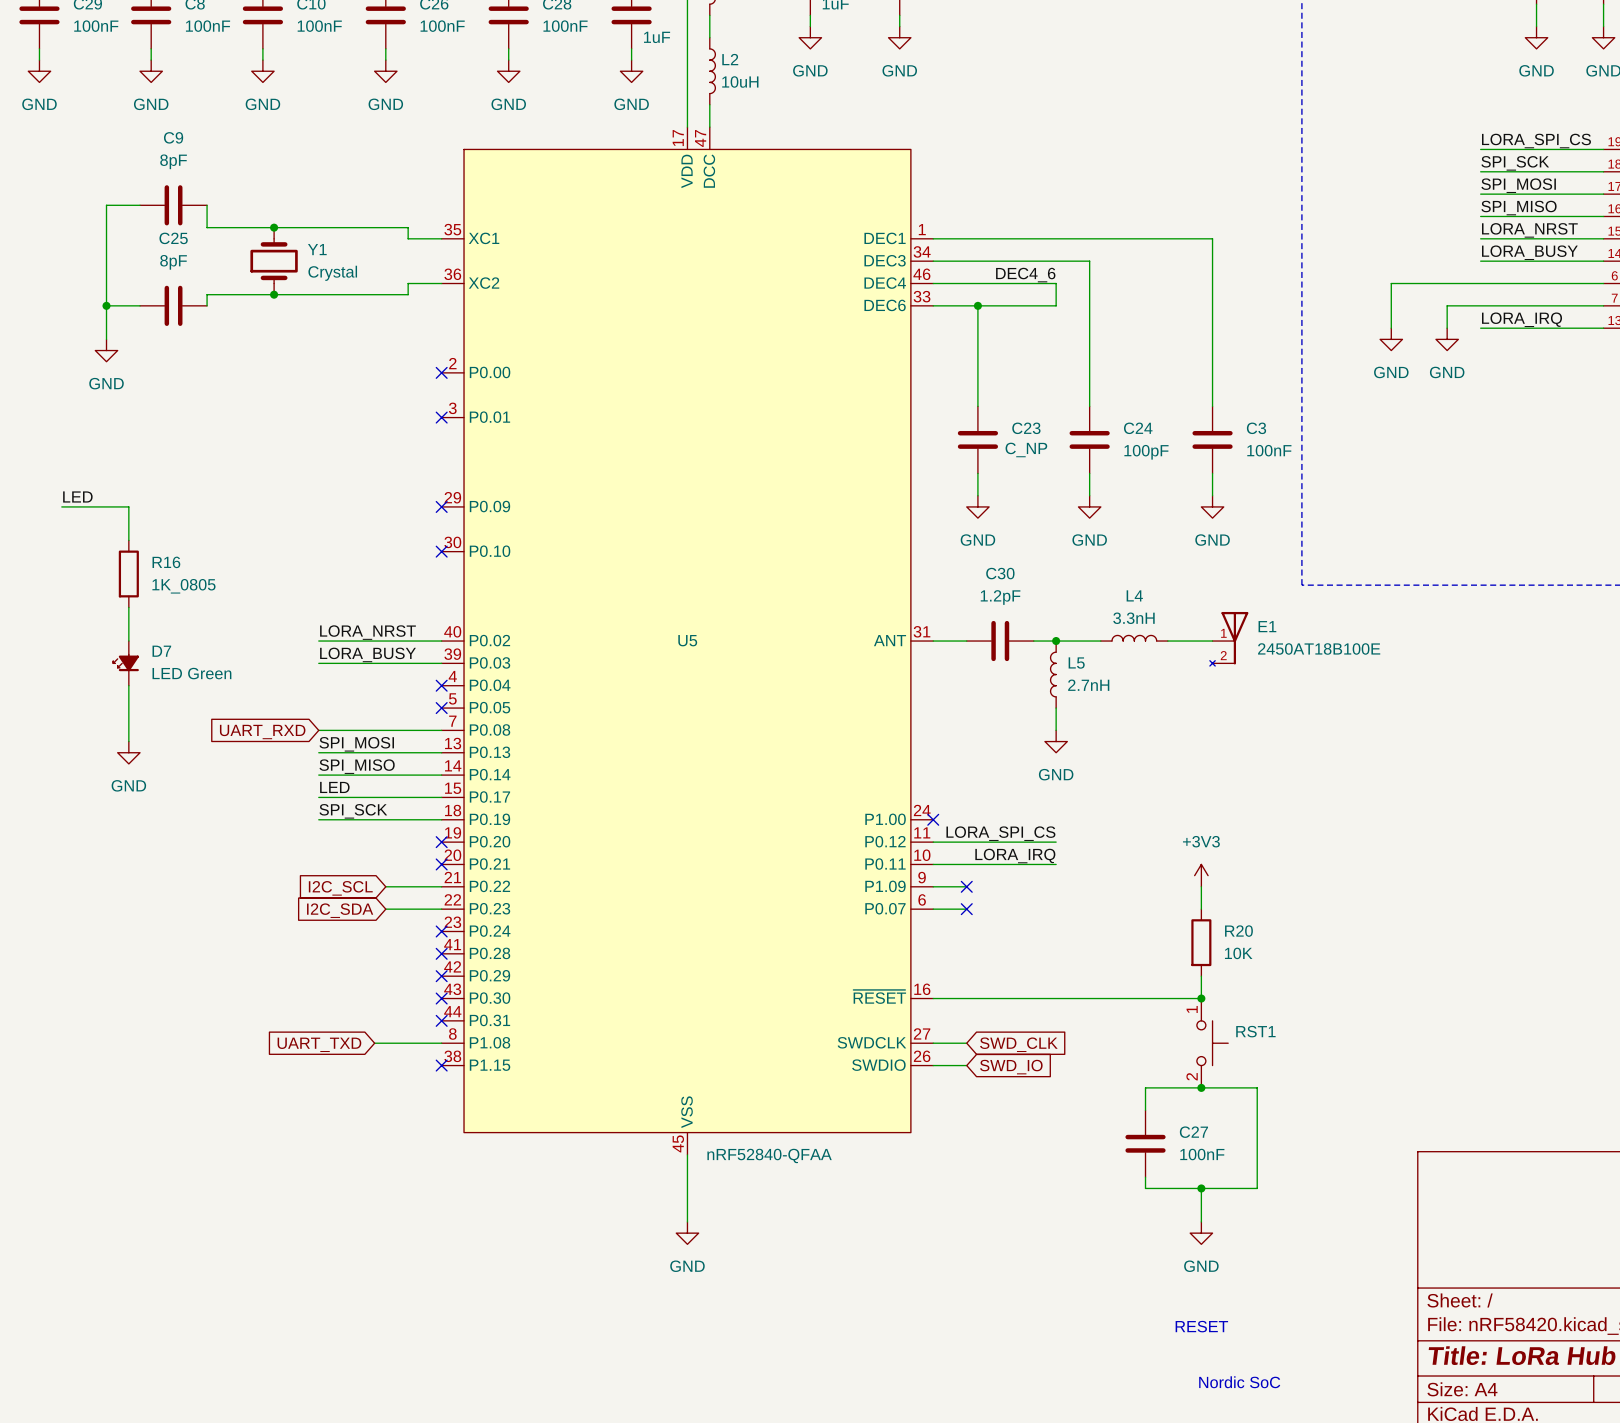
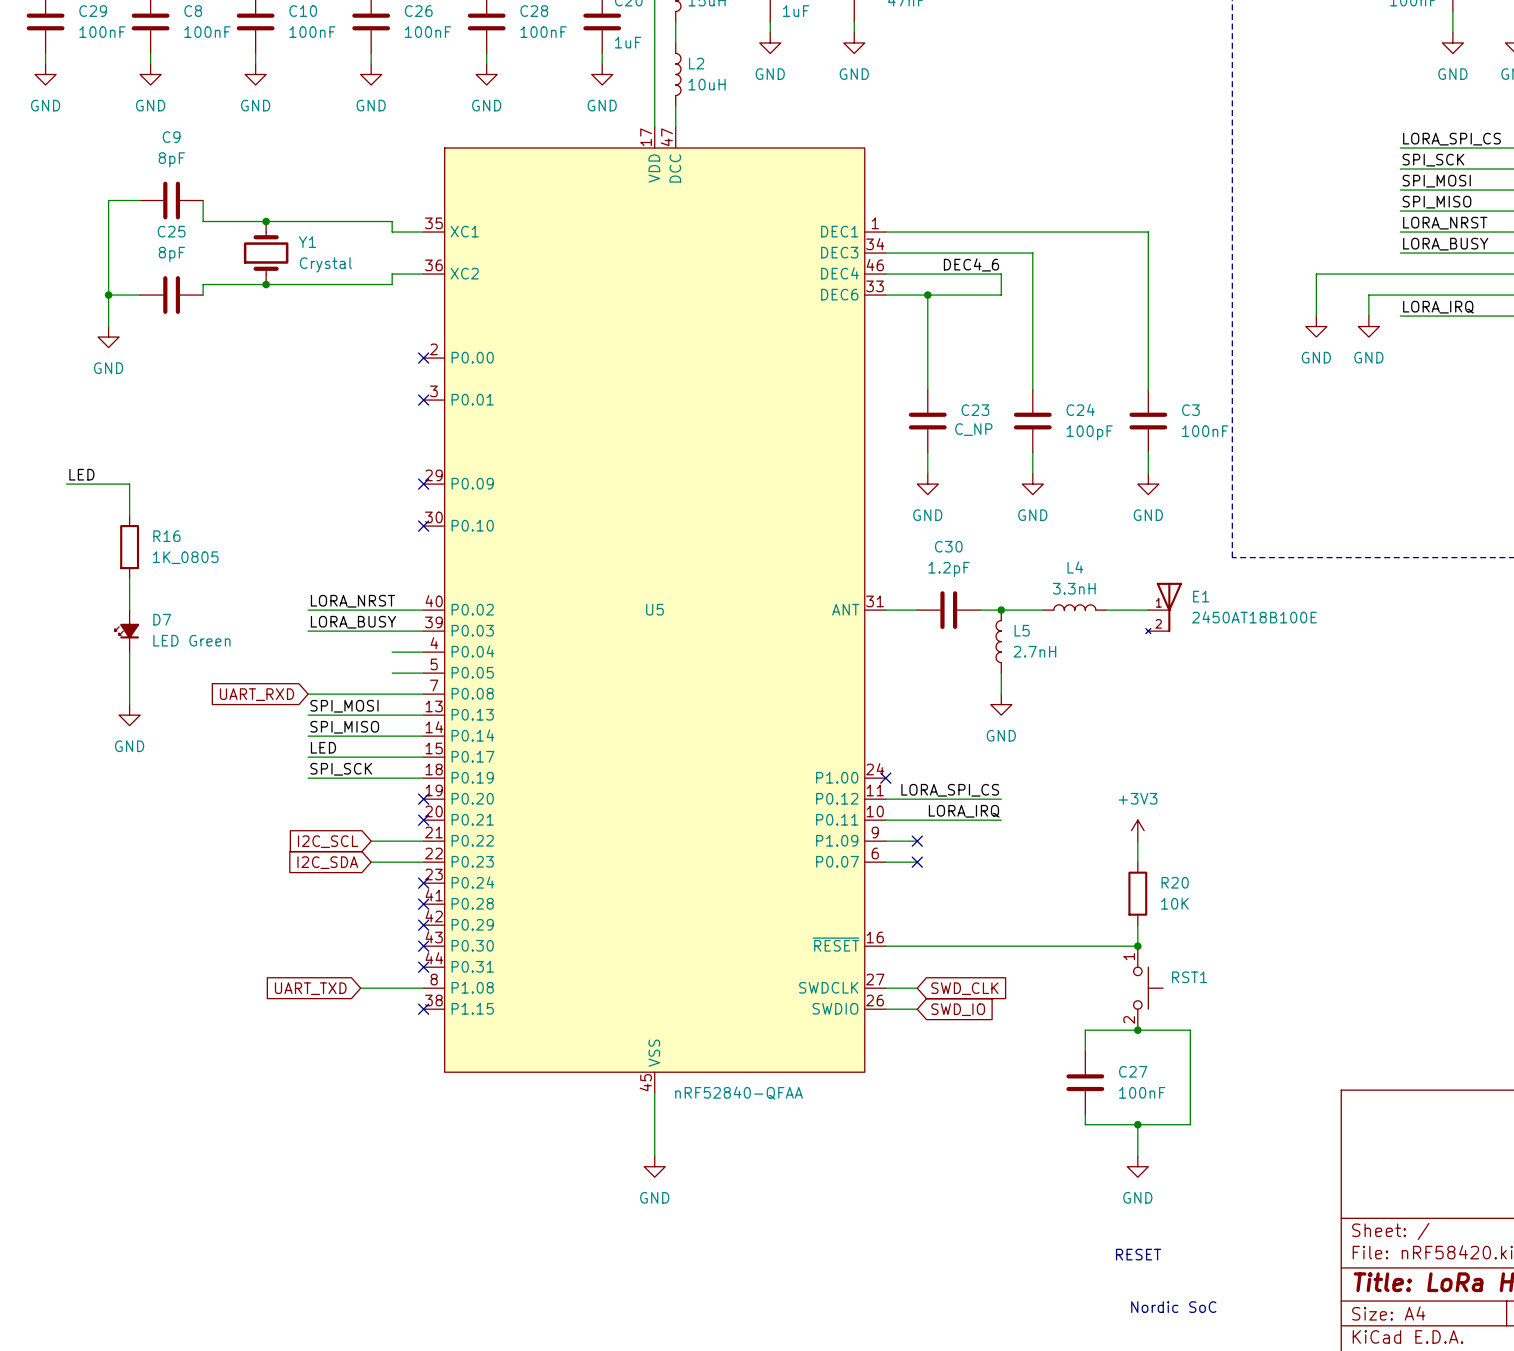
wire: none -> (392, 652) (423, 652)
no-connect mark: (441, 685) -> none
wire: none -> (392, 673) (423, 673)
no-connect mark: (441, 708) -> none

